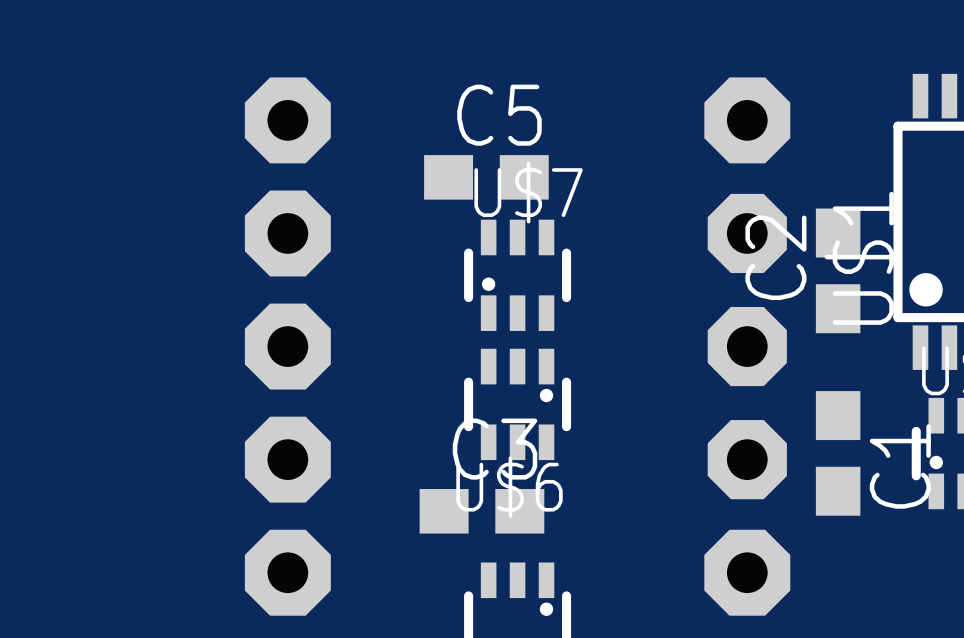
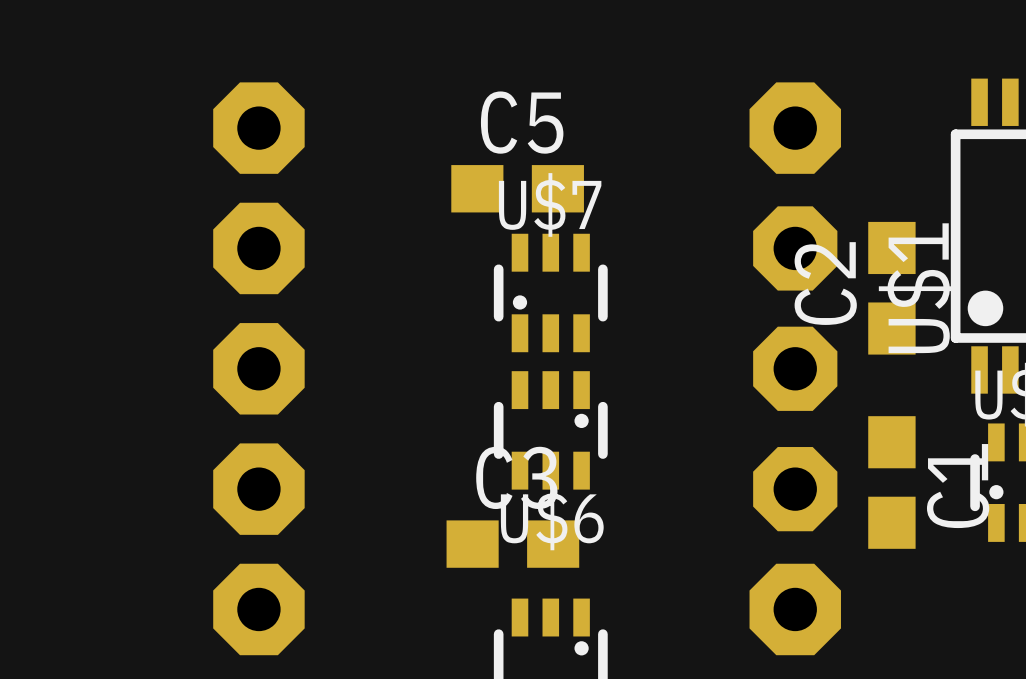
part position: (287, 346) -> (258, 368)

